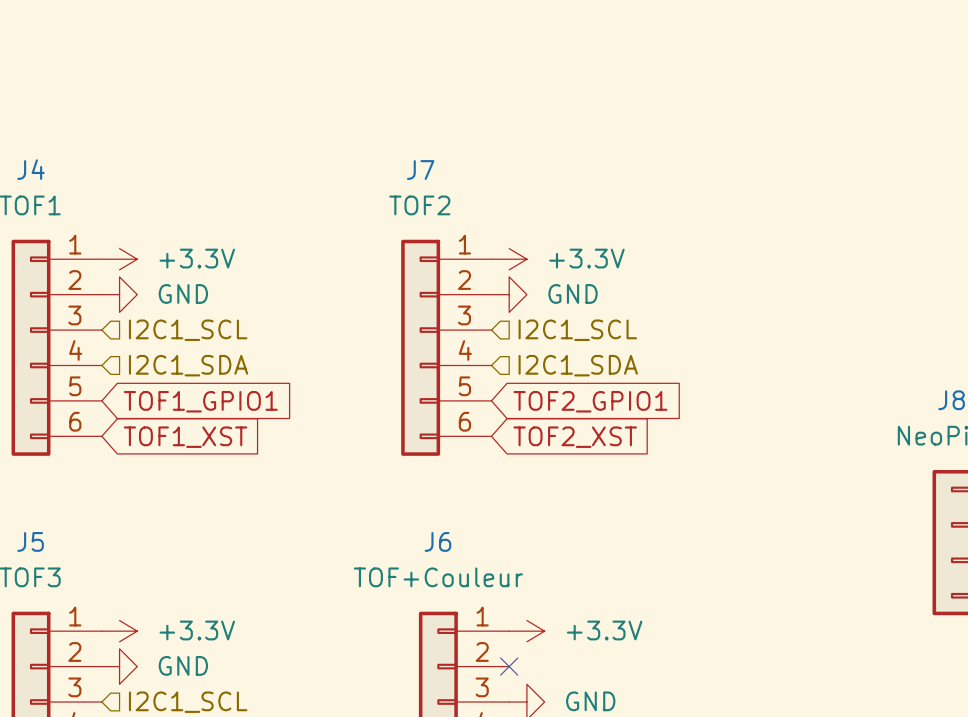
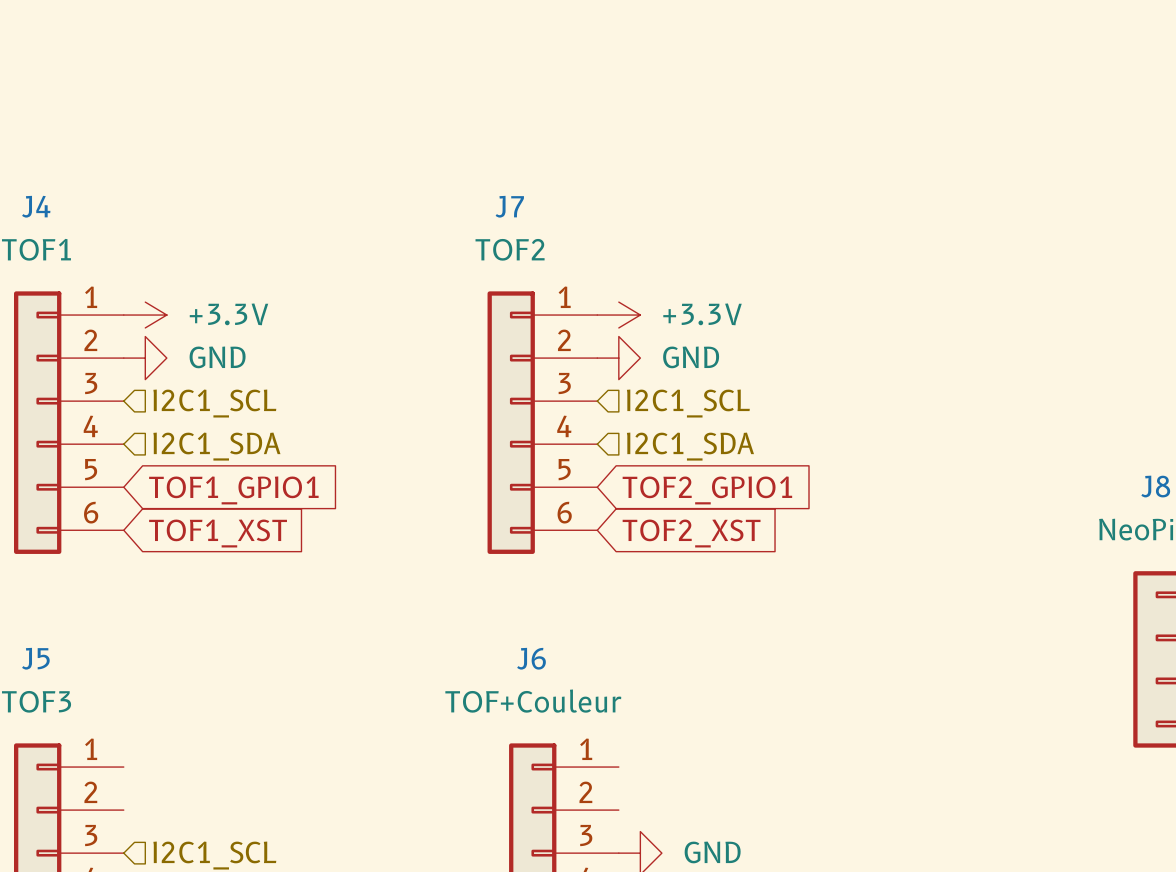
power symbol: +3.3V (119, 631) -> none
power symbol: +3.3V (526, 631) -> none
power symbol: GND (119, 666) -> none
no-connect mark: (509, 666) -> none

